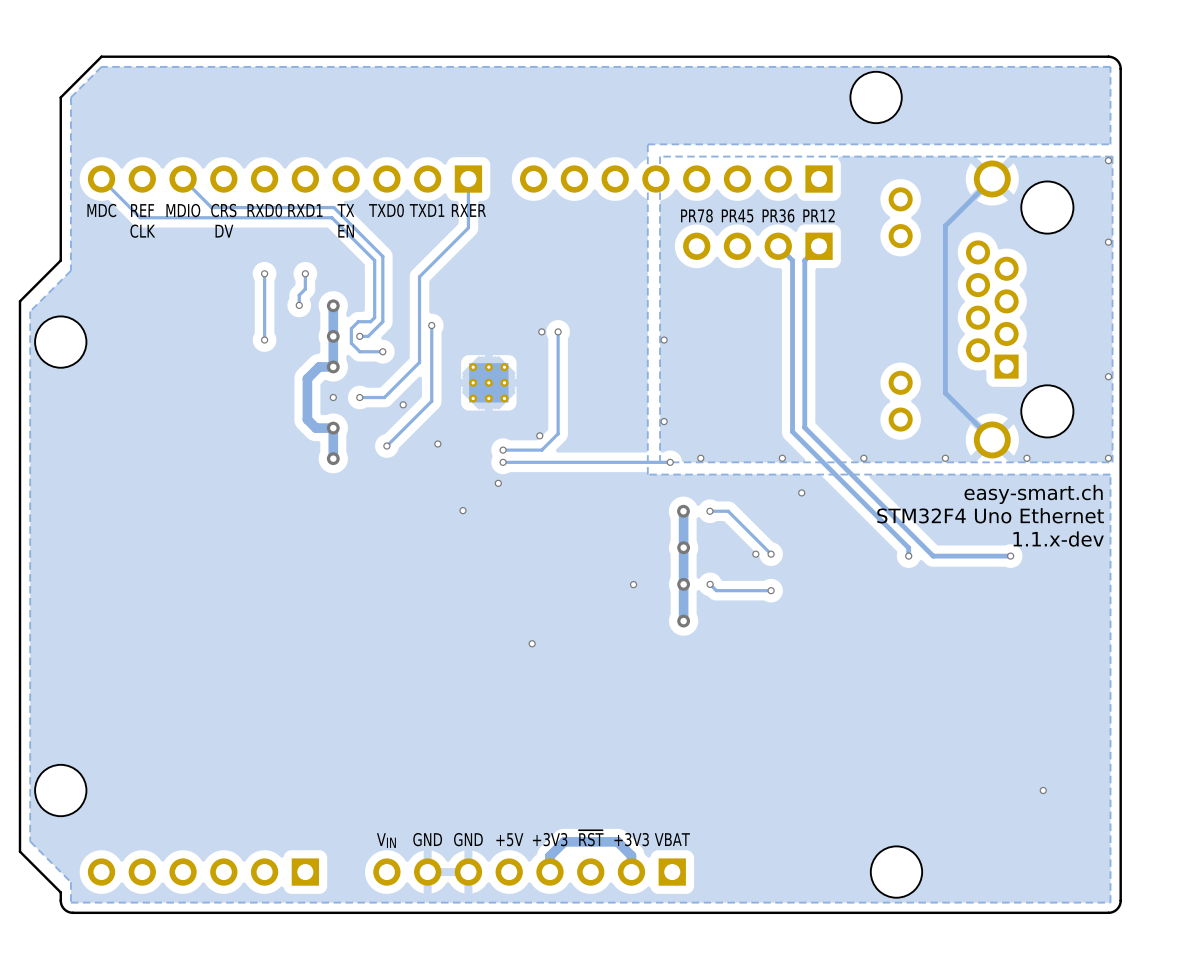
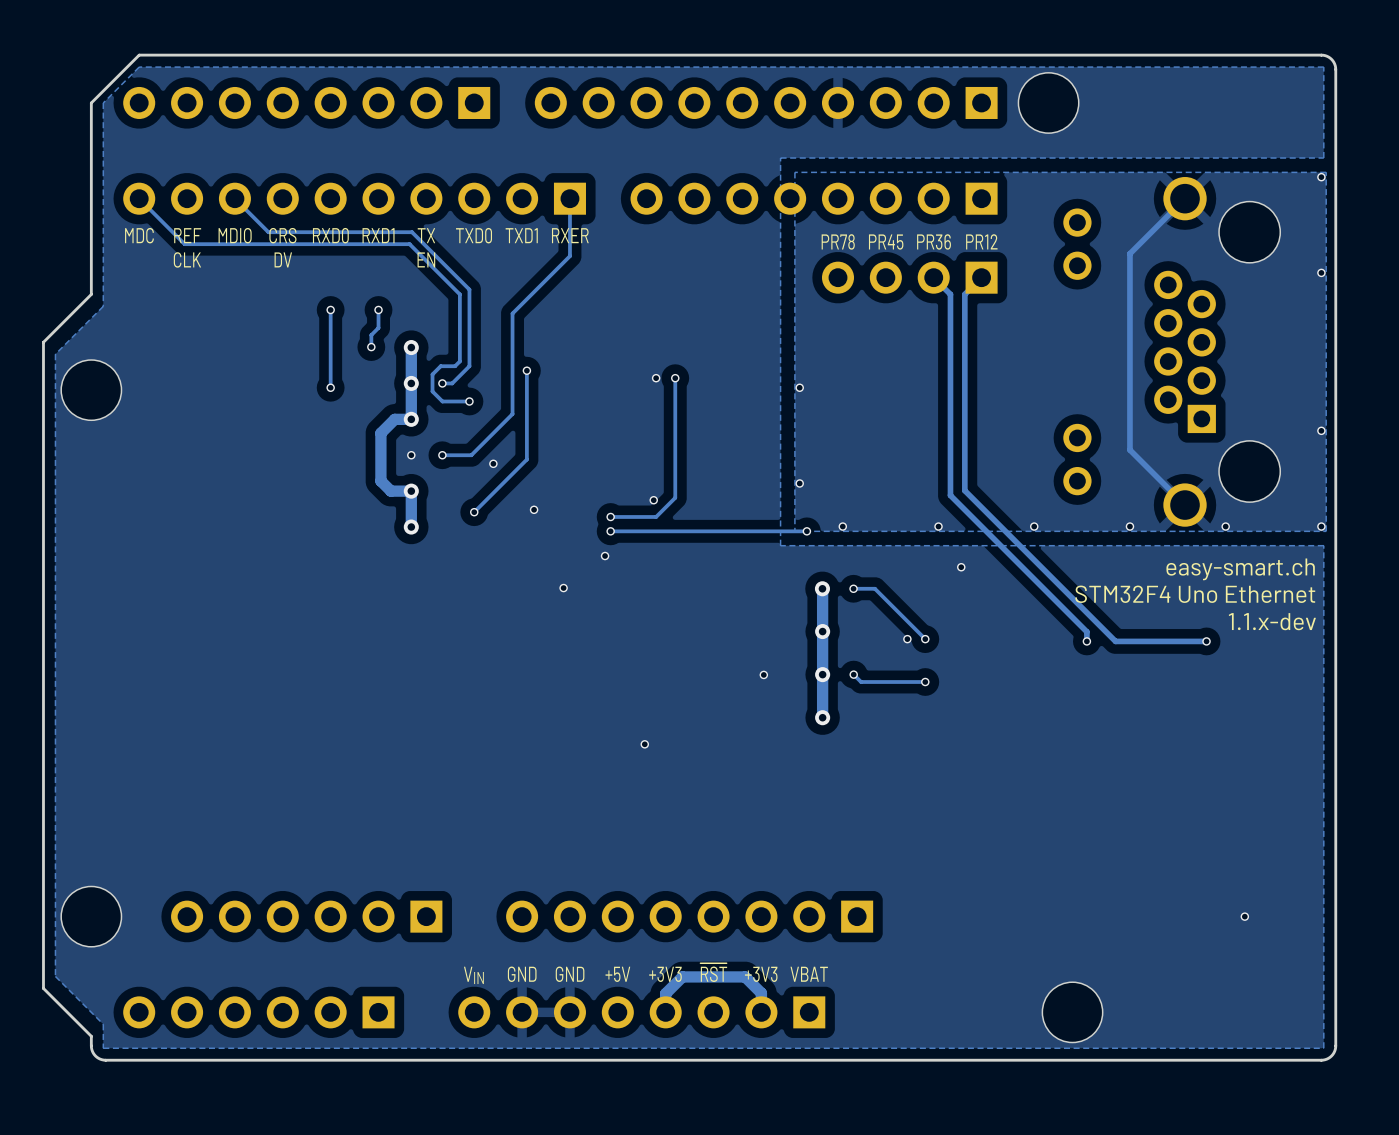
part: none -> (306, 102)
part: none -> (766, 102)
part: (488, 382) -> none
part: none -> (306, 916)
part: none -> (689, 916)

